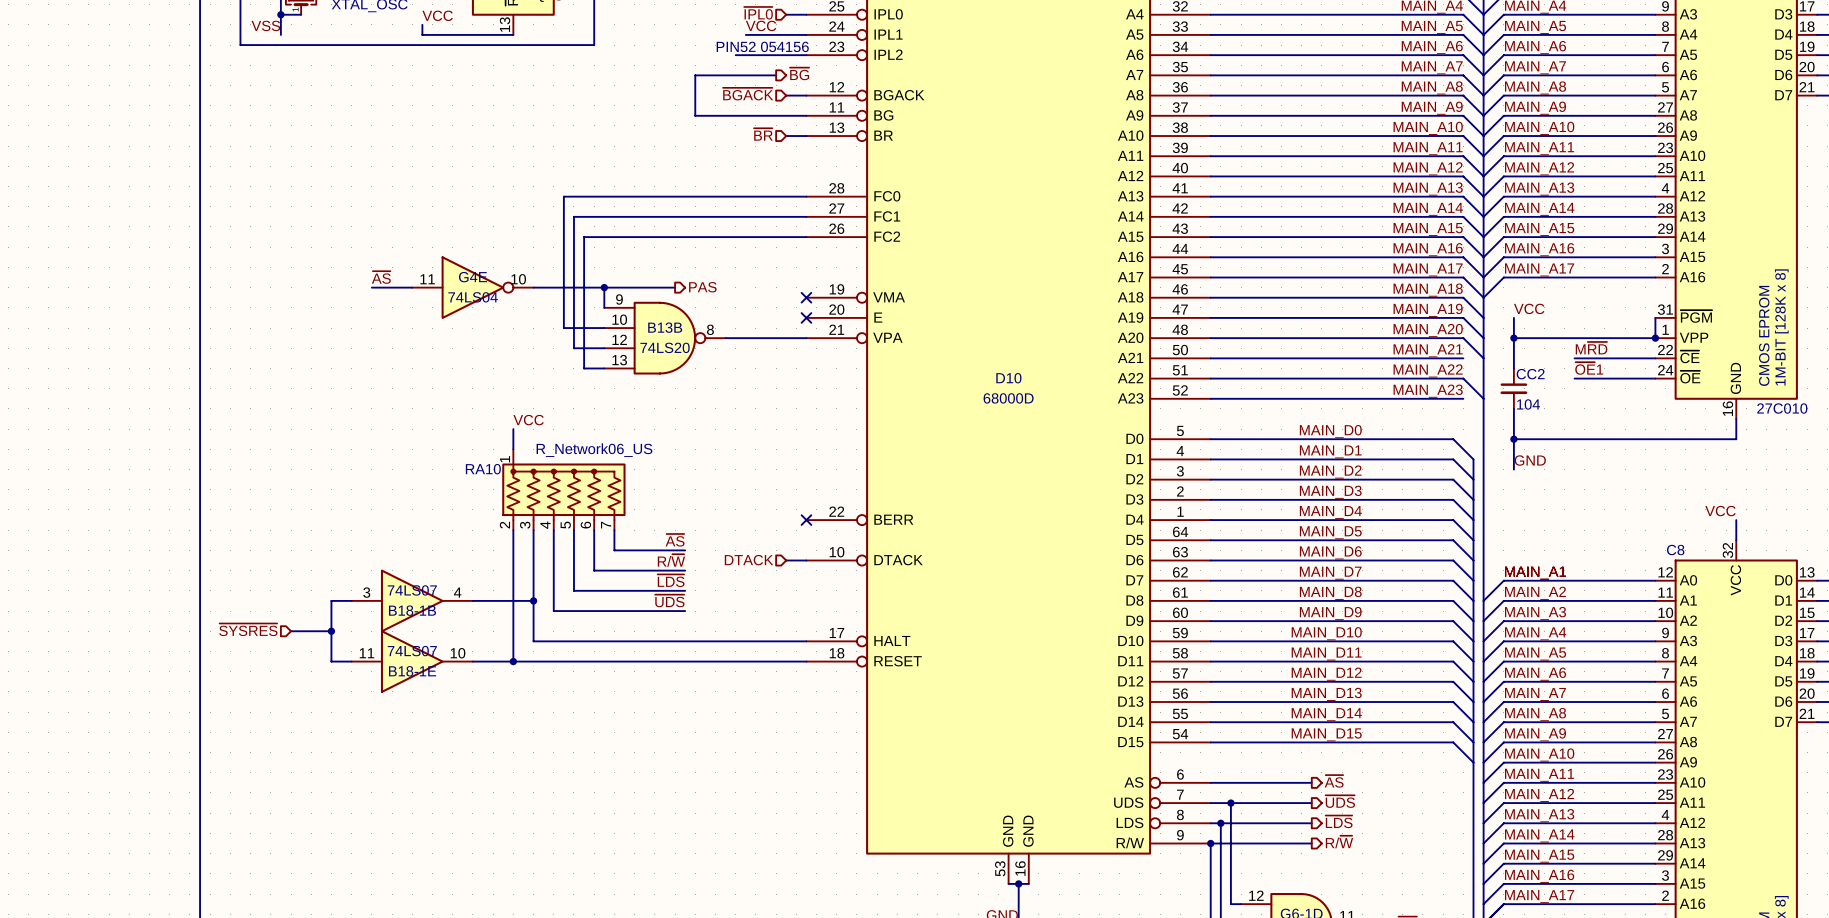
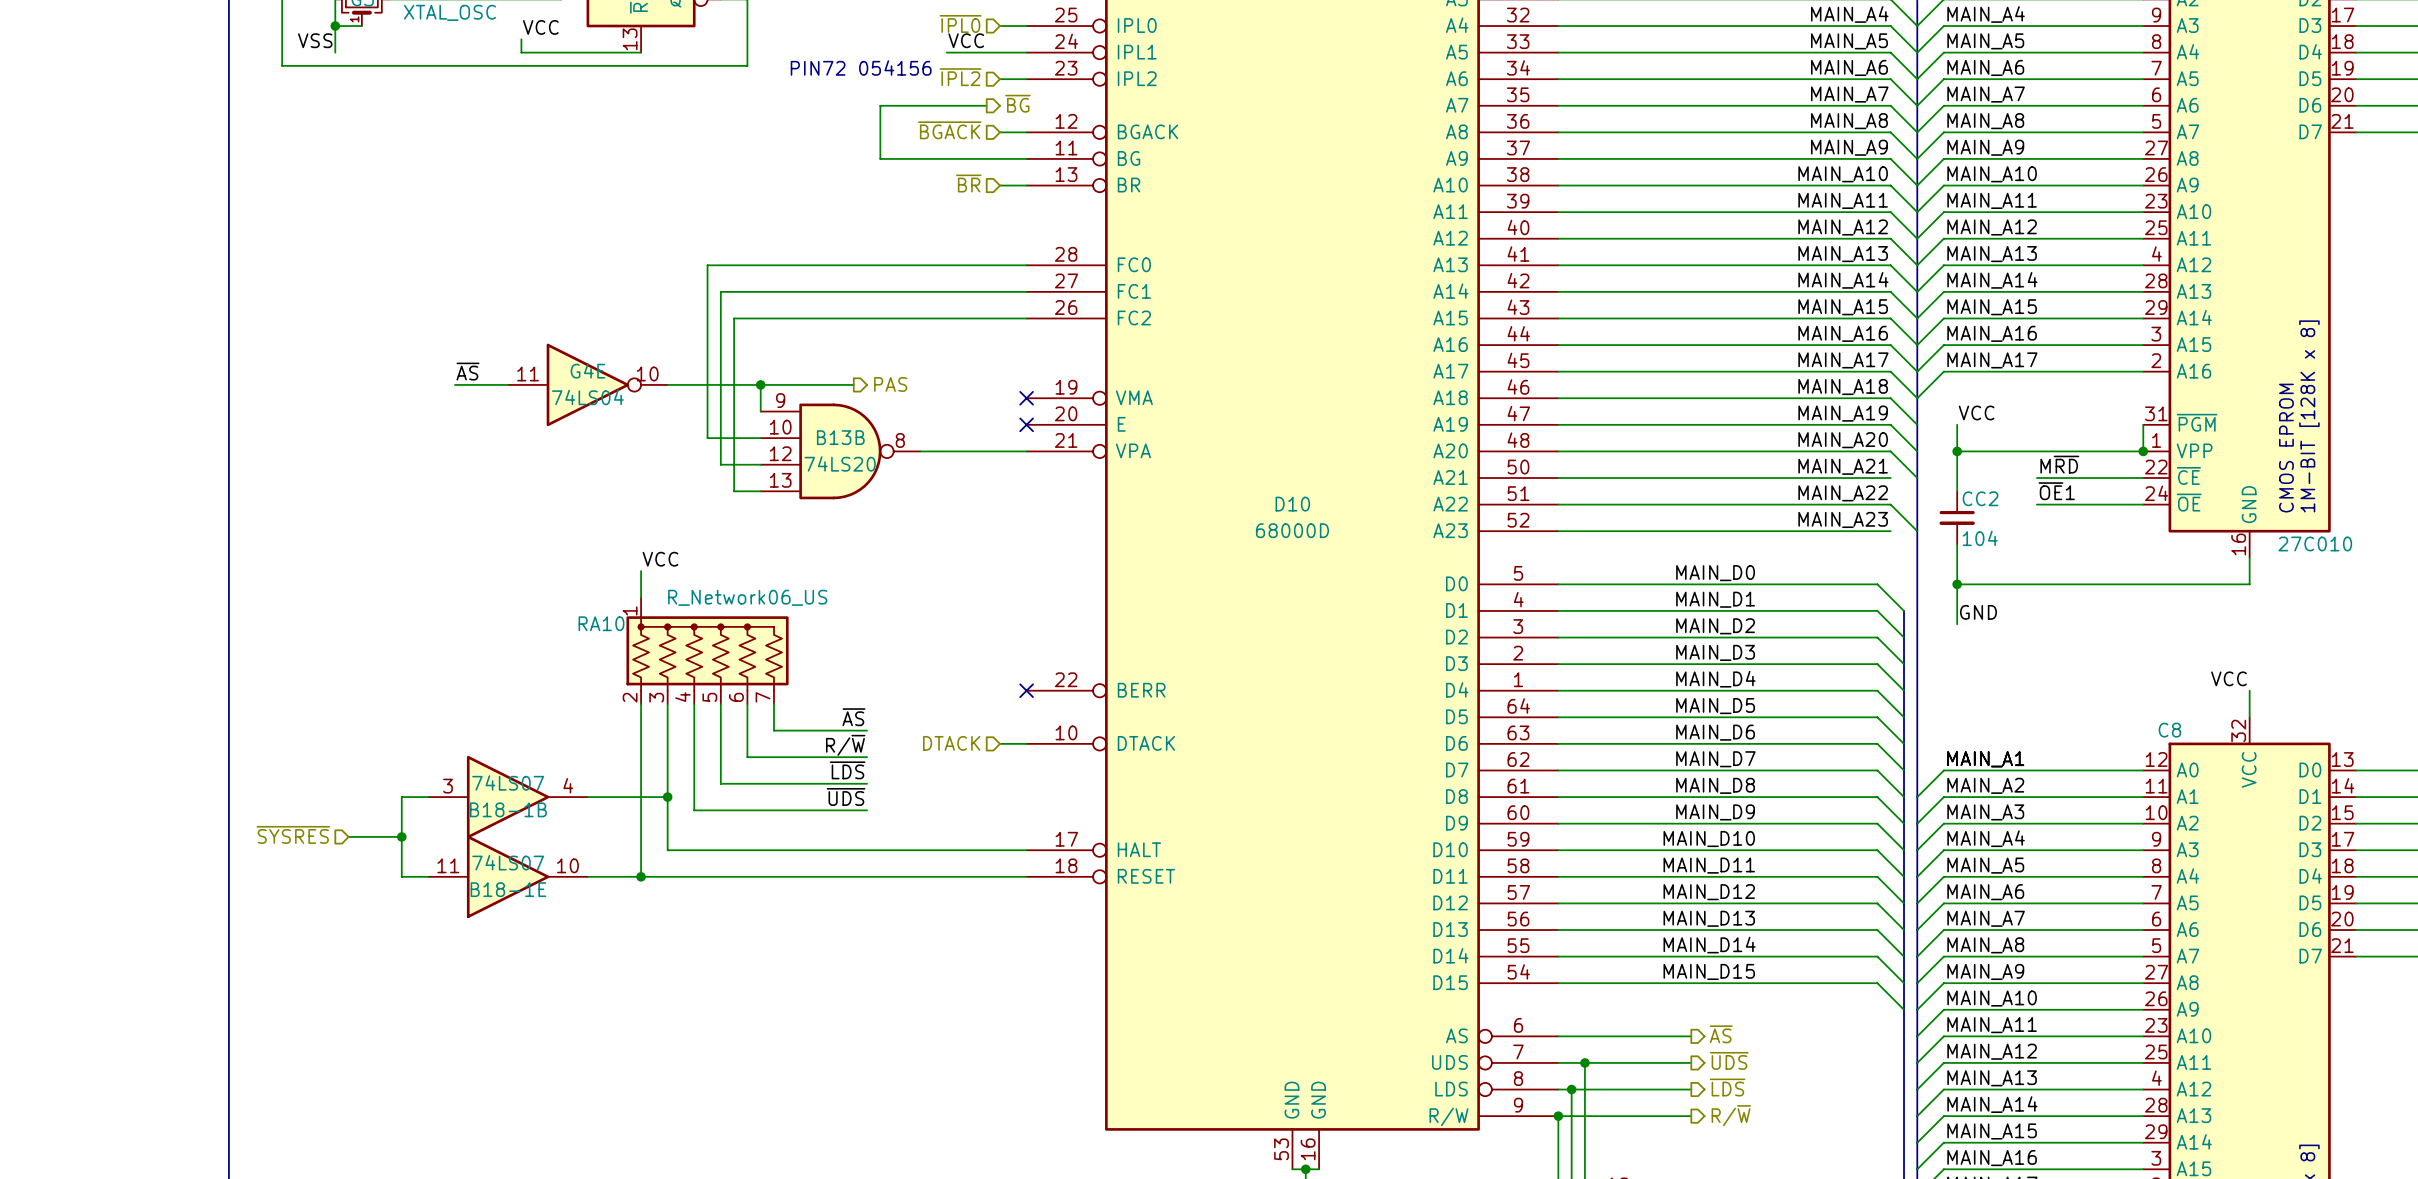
text: PIN52 054156 (762, 46) -> PIN72 054156 (861, 67)
hierarchical label: none -> ~{IPL2} (960, 77)
wire: (735, 55) (786, 55) -> none

